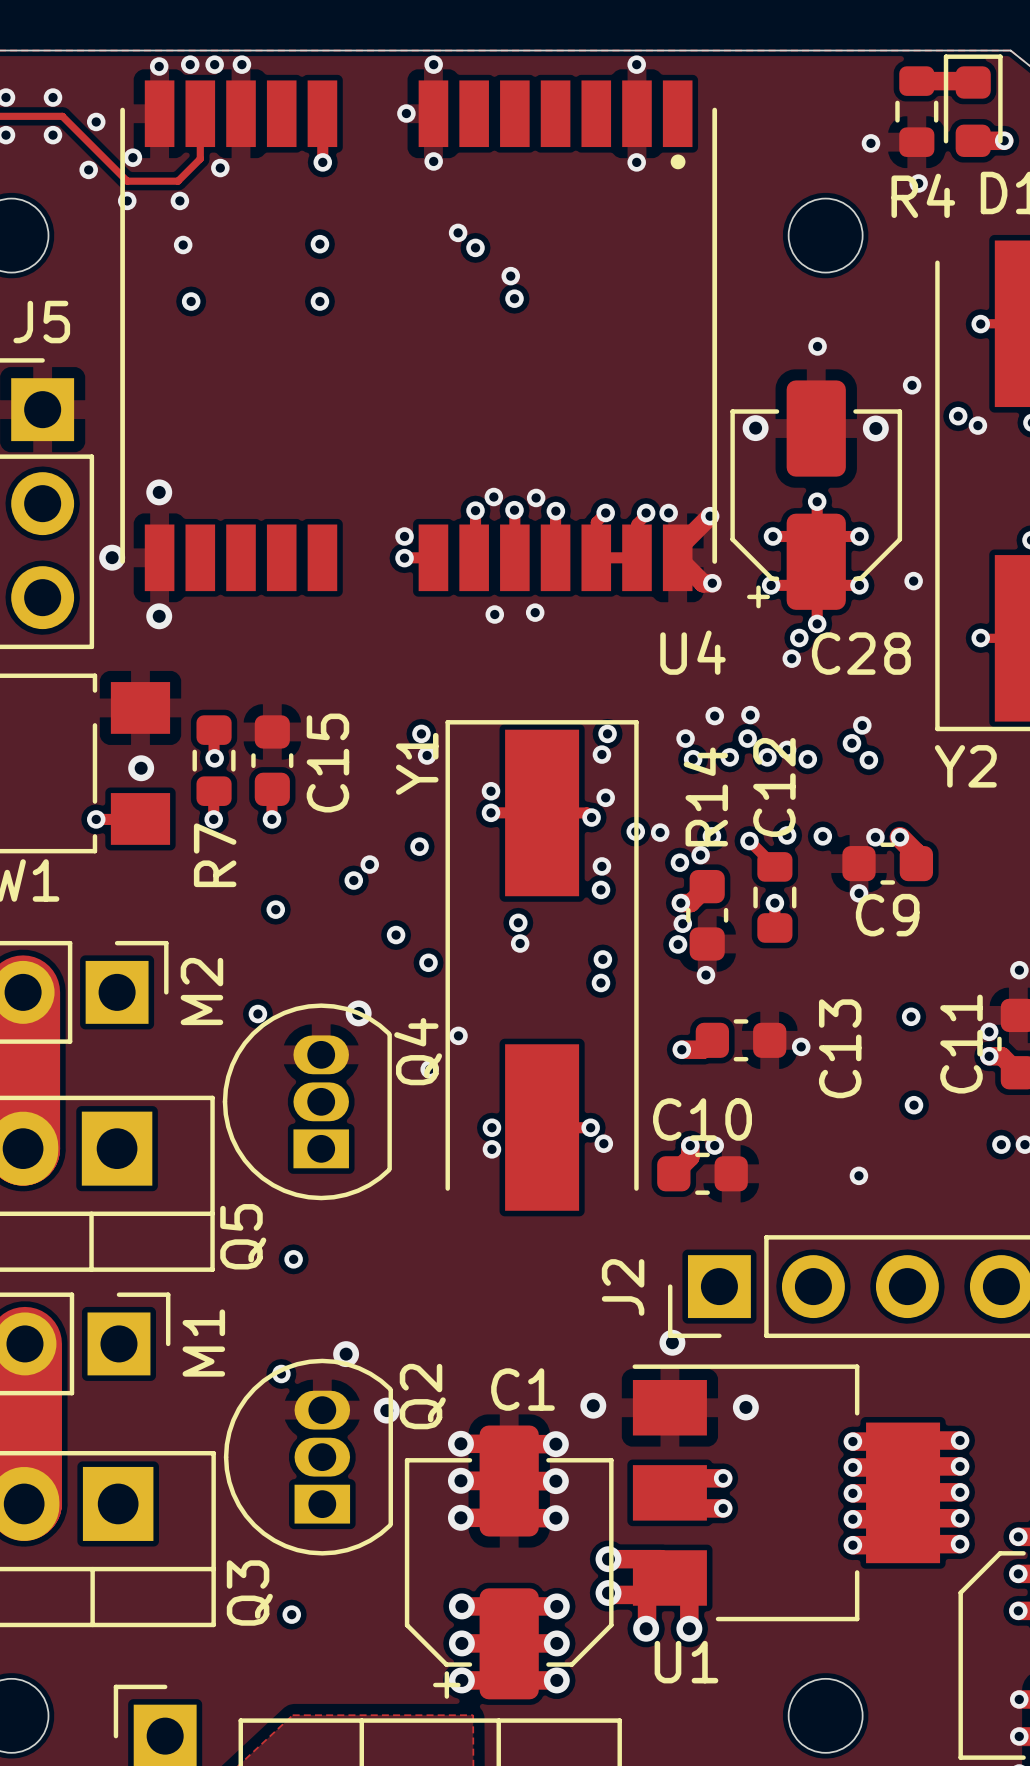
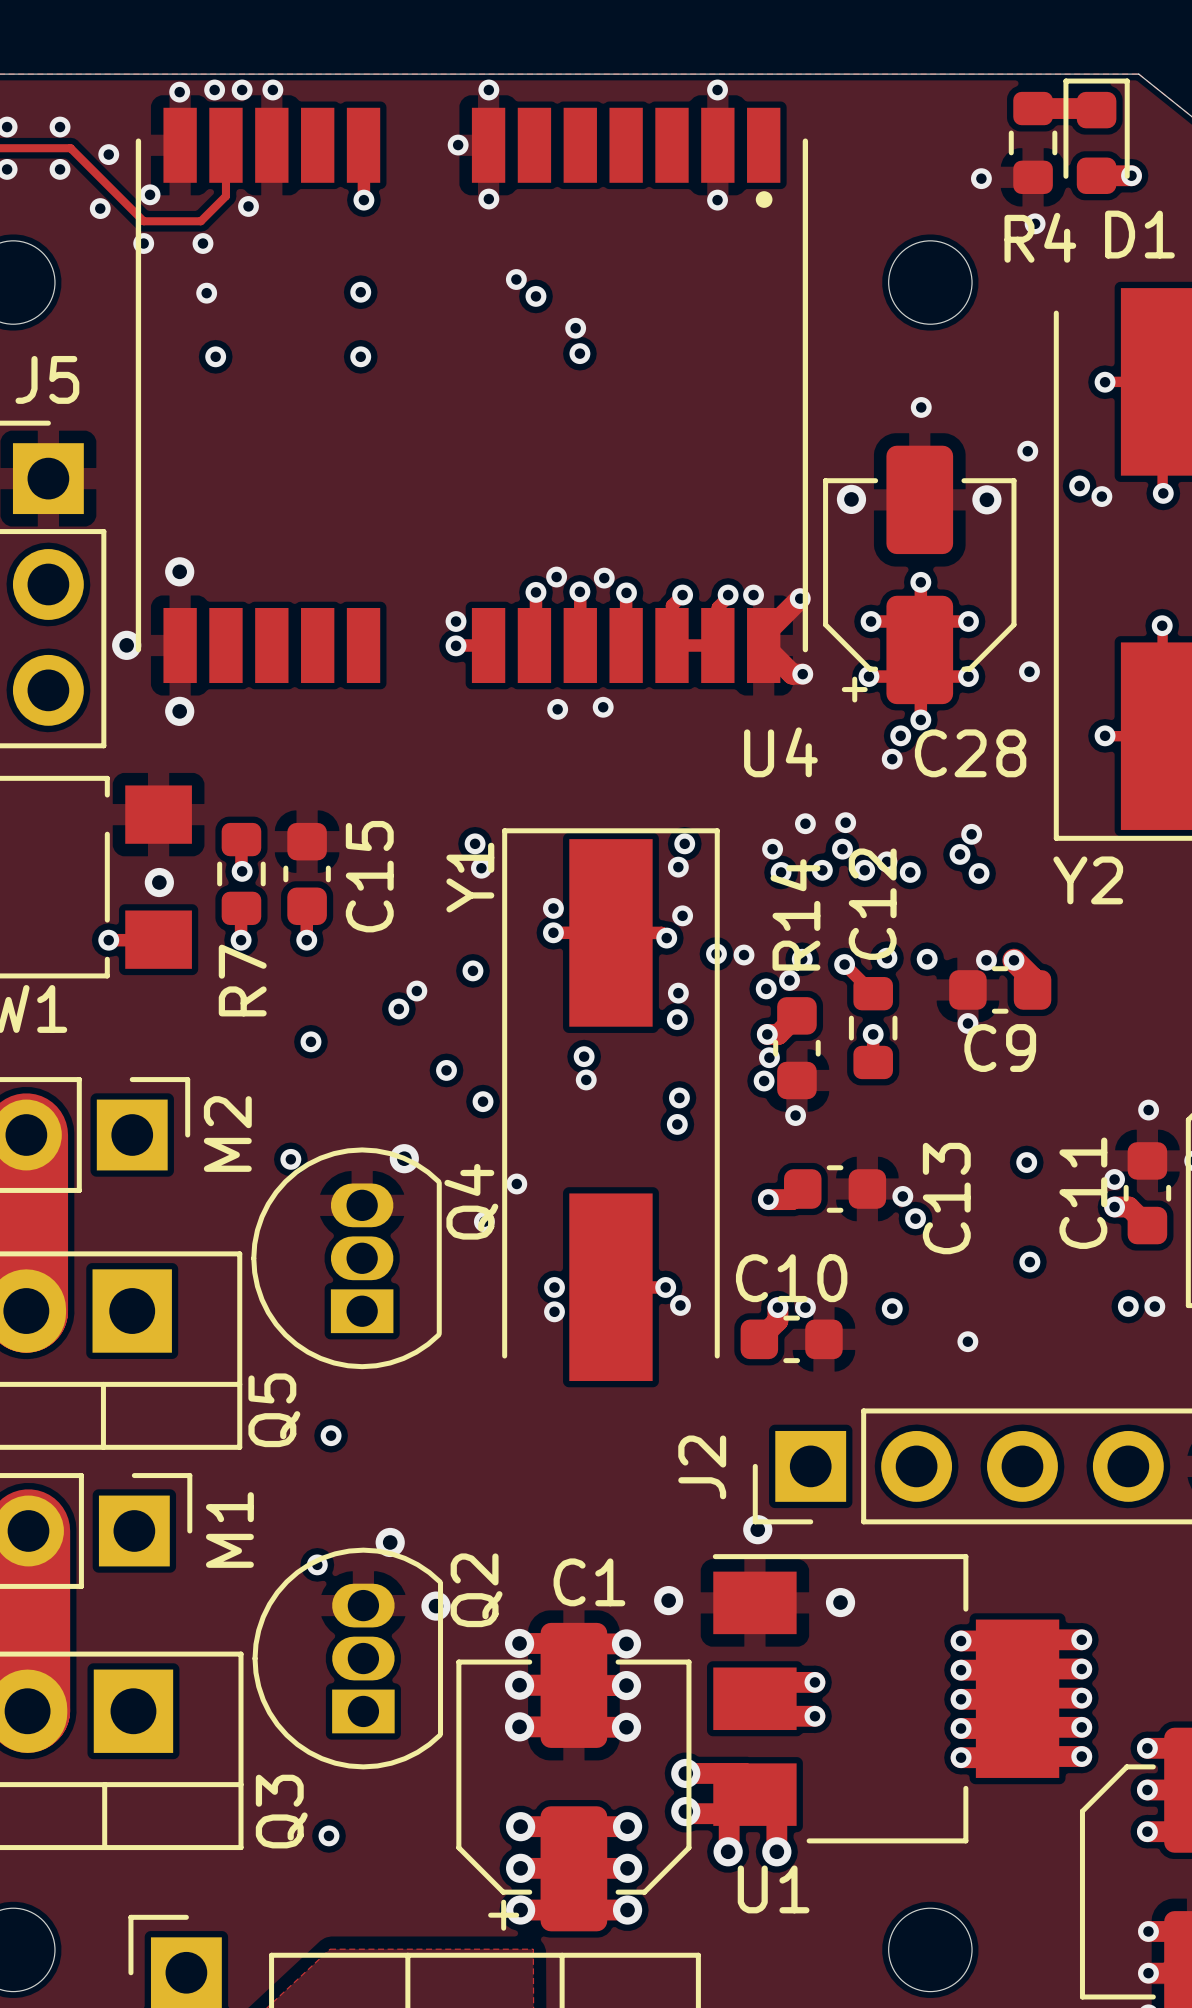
via: none -> (915, 1218)
via: none -> (892, 1308)

